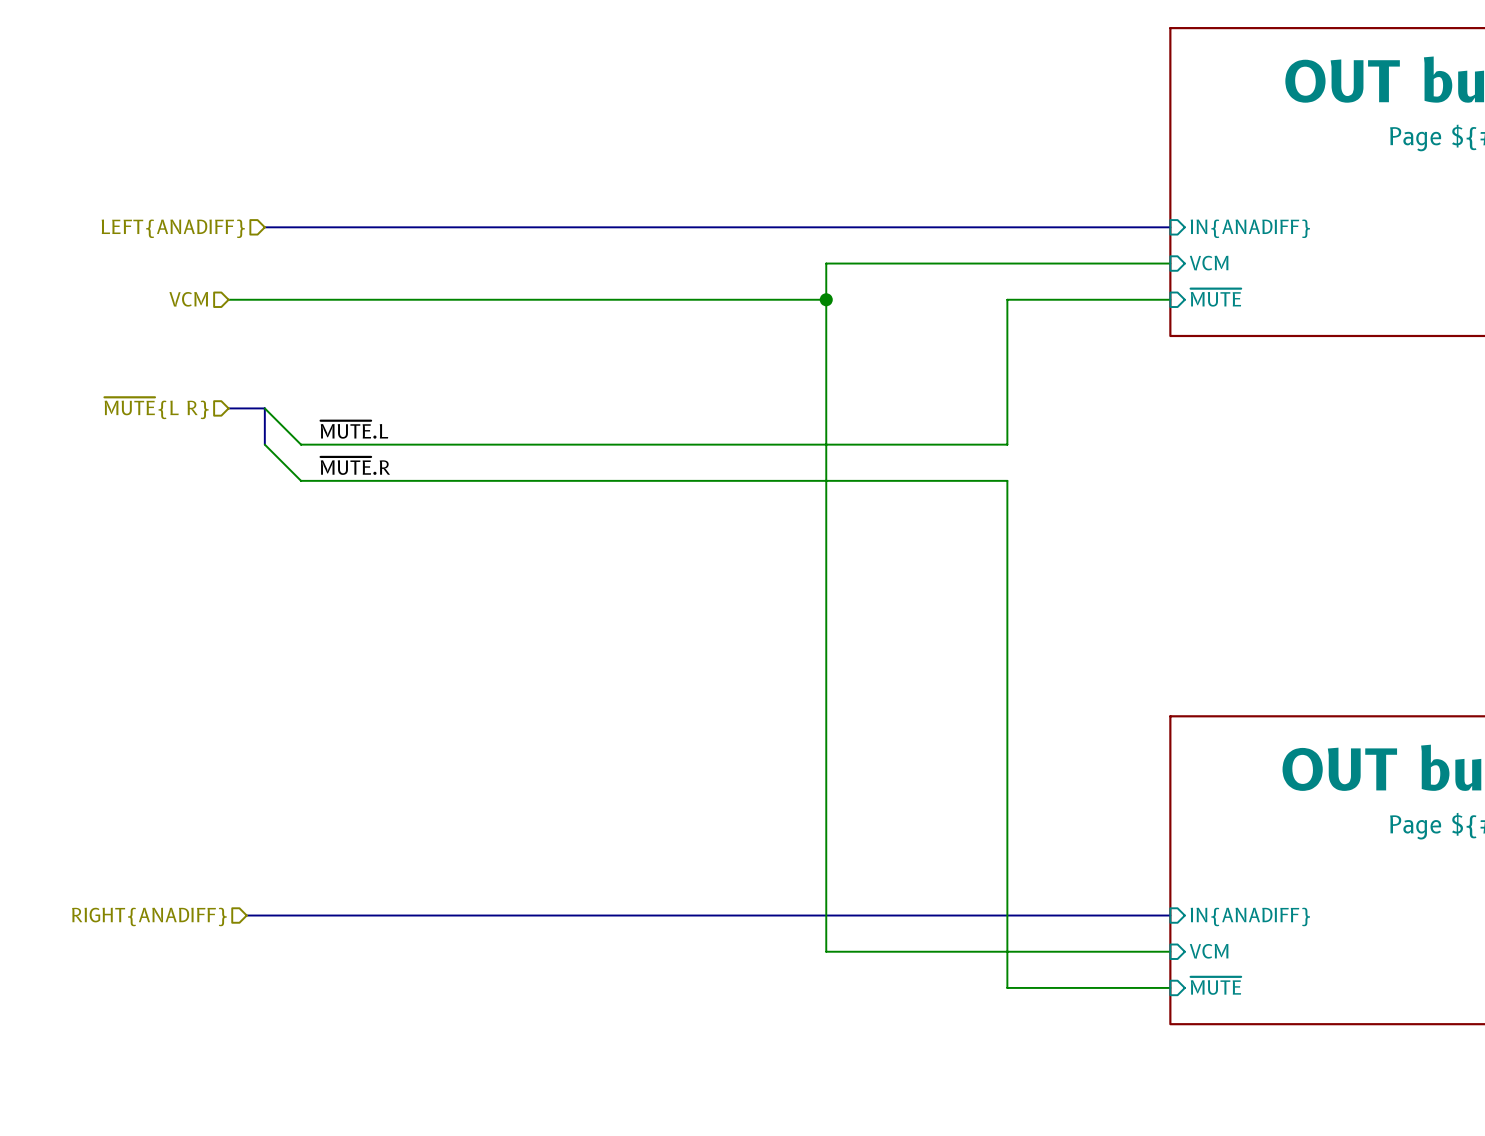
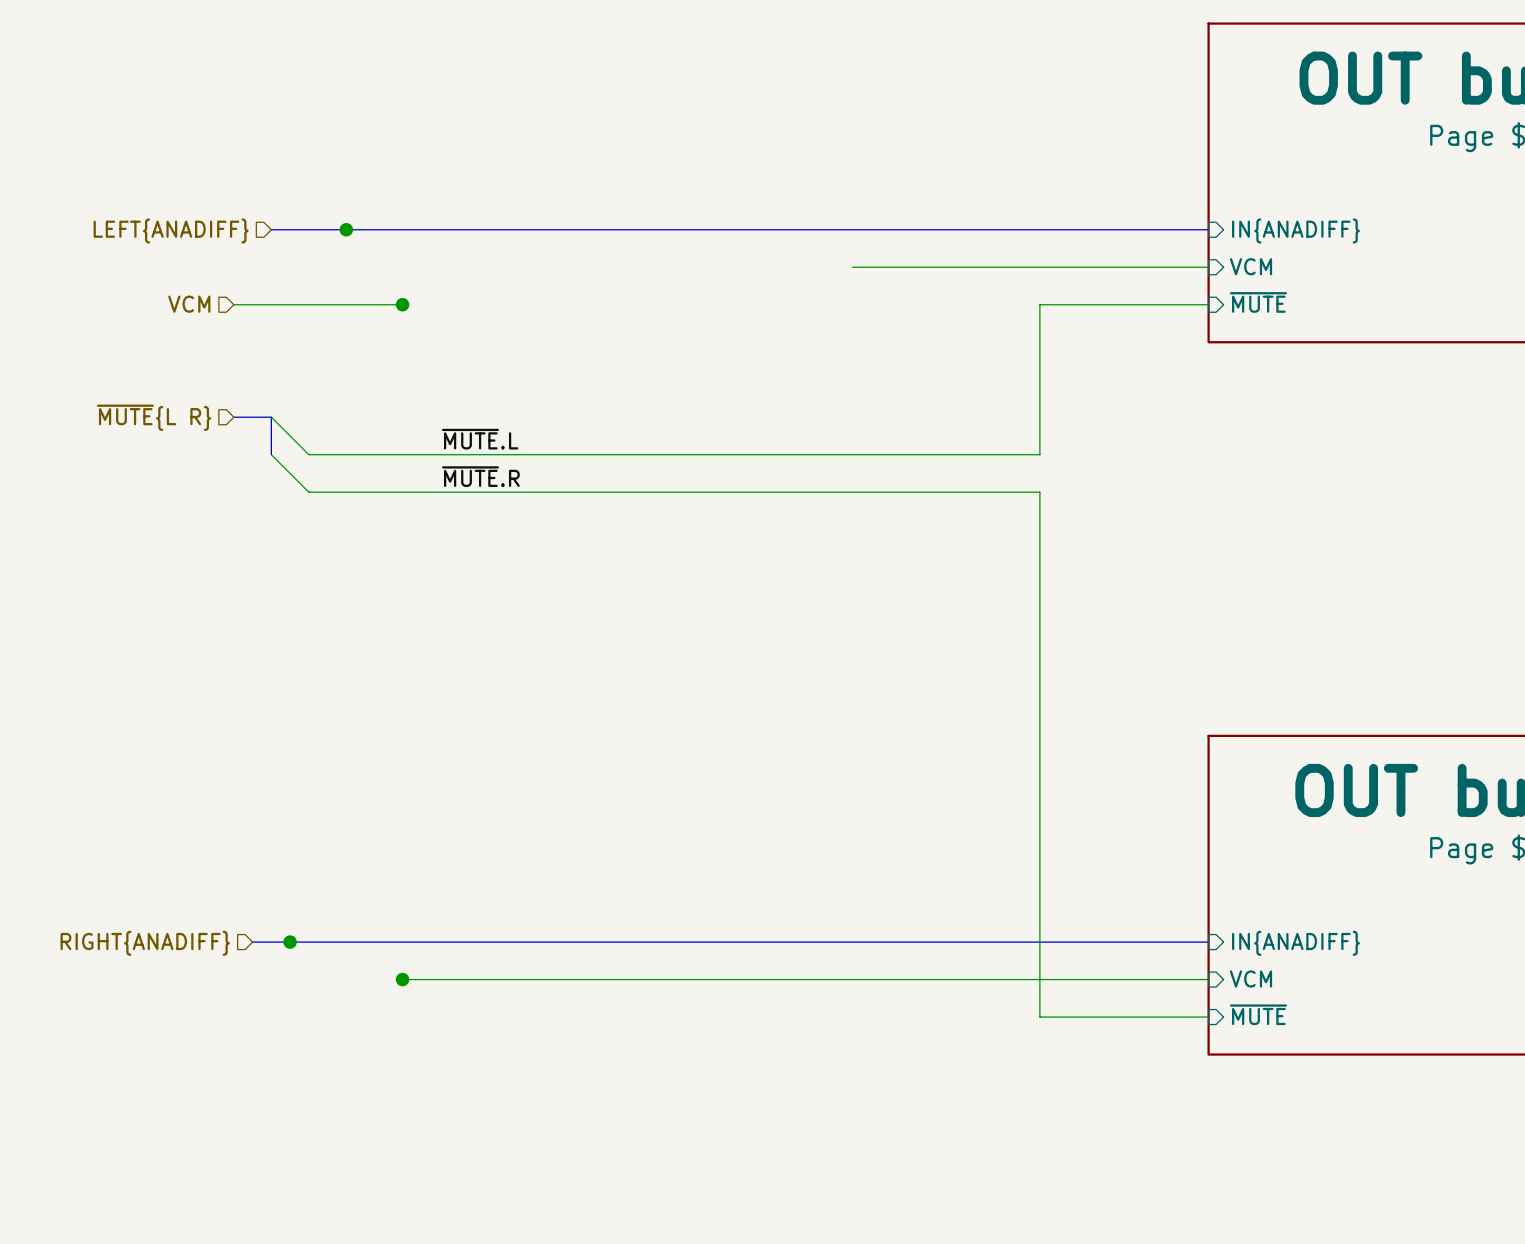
junction: none -> (346, 229)
wire: (826, 263) (826, 951) -> (402, 979) (852, 979)
wire: (391, 299) (826, 299) -> none
junction: none -> (402, 304)
junction: (826, 299) -> none
label position: ~{MUTE}.L (354, 429) -> ~{MUTE}.L (480, 439)
label position: ~{MUTE}.R (355, 465) -> ~{MUTE}.R (480, 476)
junction: none -> (290, 942)
junction: none -> (402, 979)

